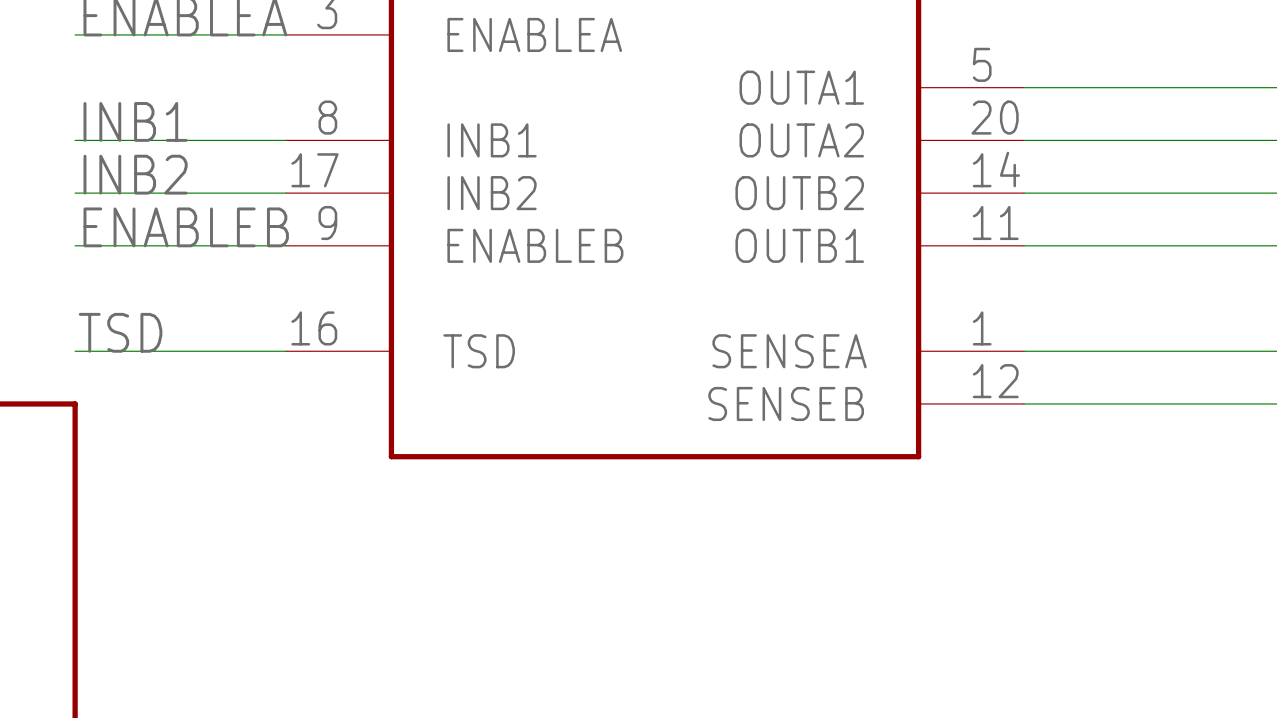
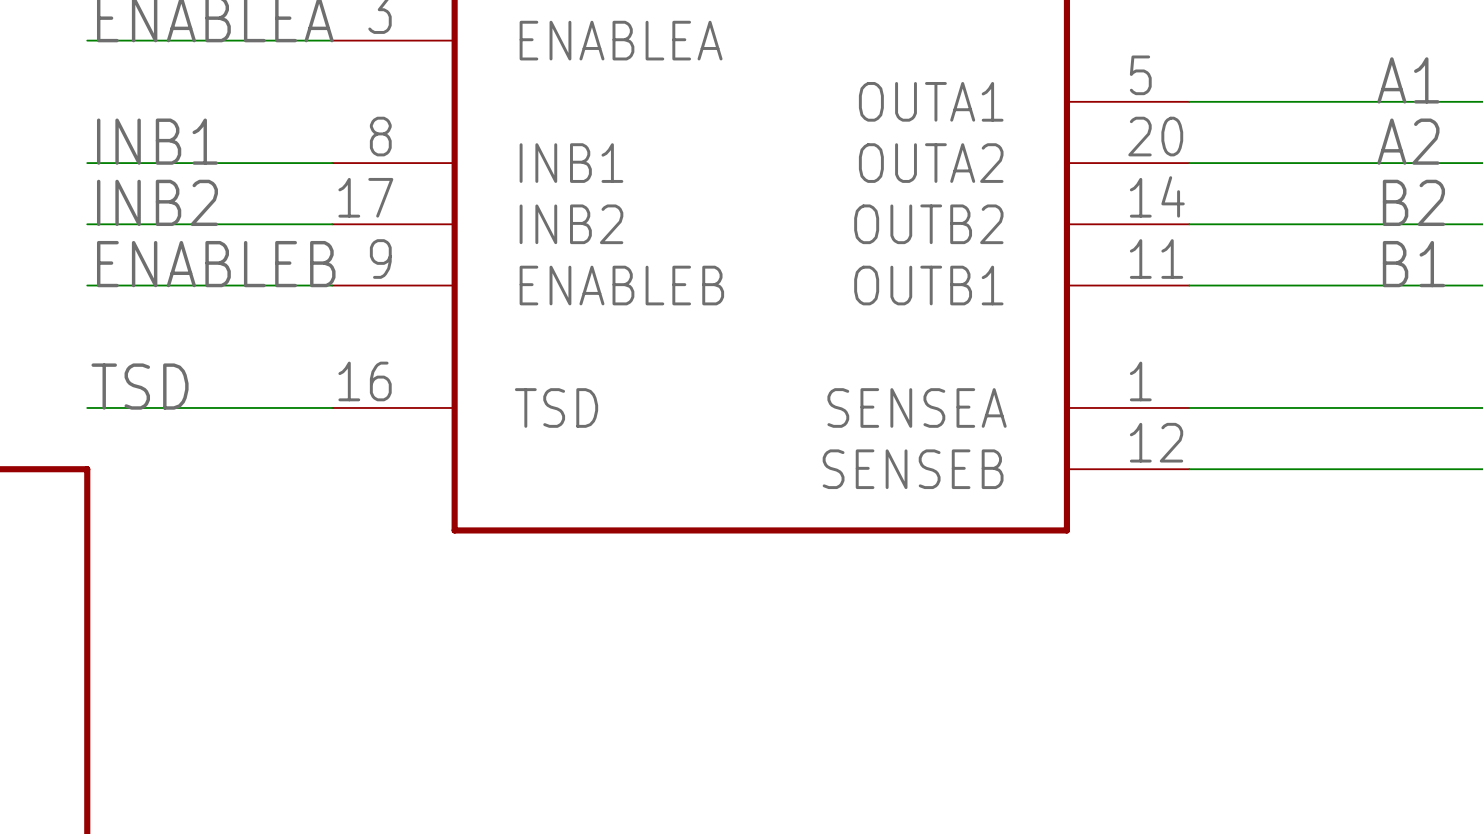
label: none -> A1 (1408, 80)
label: none -> A2 (1408, 141)
label: none -> B2 (1413, 202)
label: none -> B1 (1413, 264)

